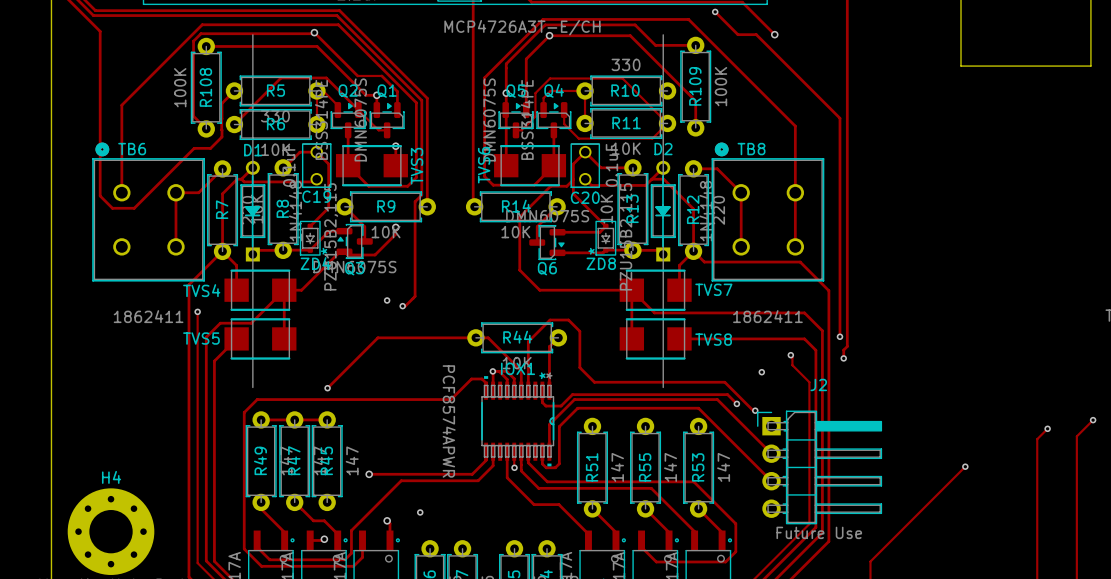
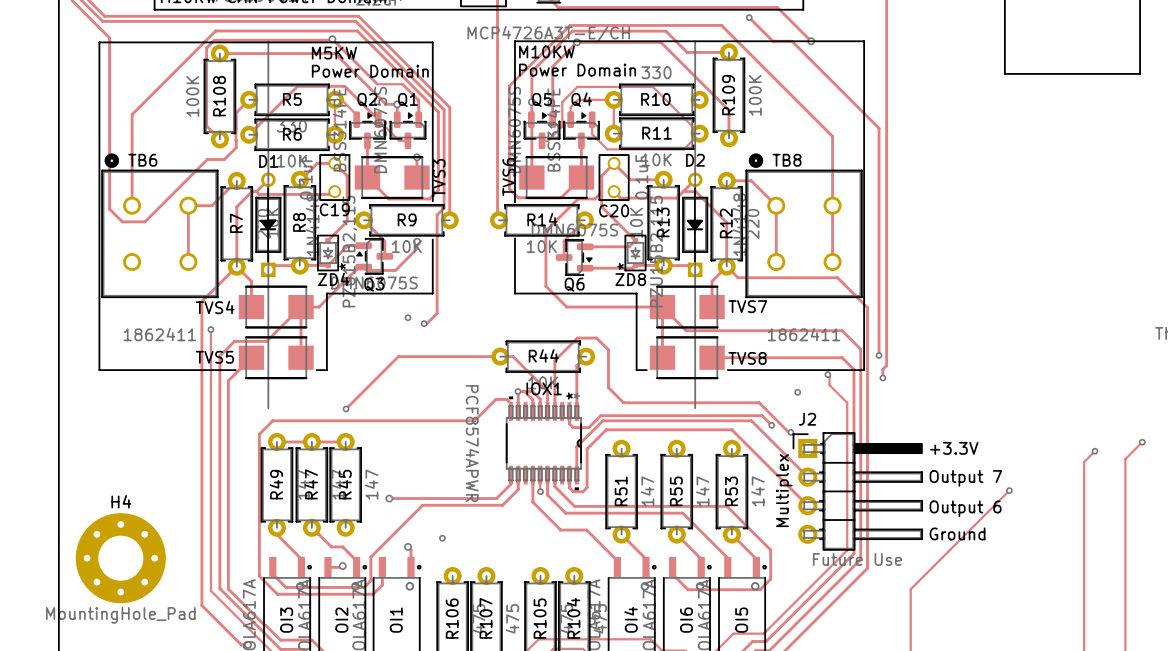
text: none -> M10KW (546, 51)
text: none -> M5KW (334, 53)
text: none -> Power Domain (577, 70)
text: none -> Power Domain (370, 71)
line: none -> (432, 201) (432, 42) (99, 42) (99, 370) (235, 370)
line: none -> (514, 202) (514, 41) (864, 41) (864, 370) (727, 370)
line: none -> (514, 238) (514, 293) (636, 293) (636, 370) (646, 370)
line: none -> (432, 239) (432, 293) (326, 293) (326, 370) (316, 370)
J2 name position: J2 (818, 384) -> J2 (807, 419)
text: none -> +3.3V (954, 448)
text: none -> Output 7 (965, 478)
text: none -> Multiplex (784, 490)
text: none -> Output 6 (965, 508)
text: none -> Ground (957, 533)

